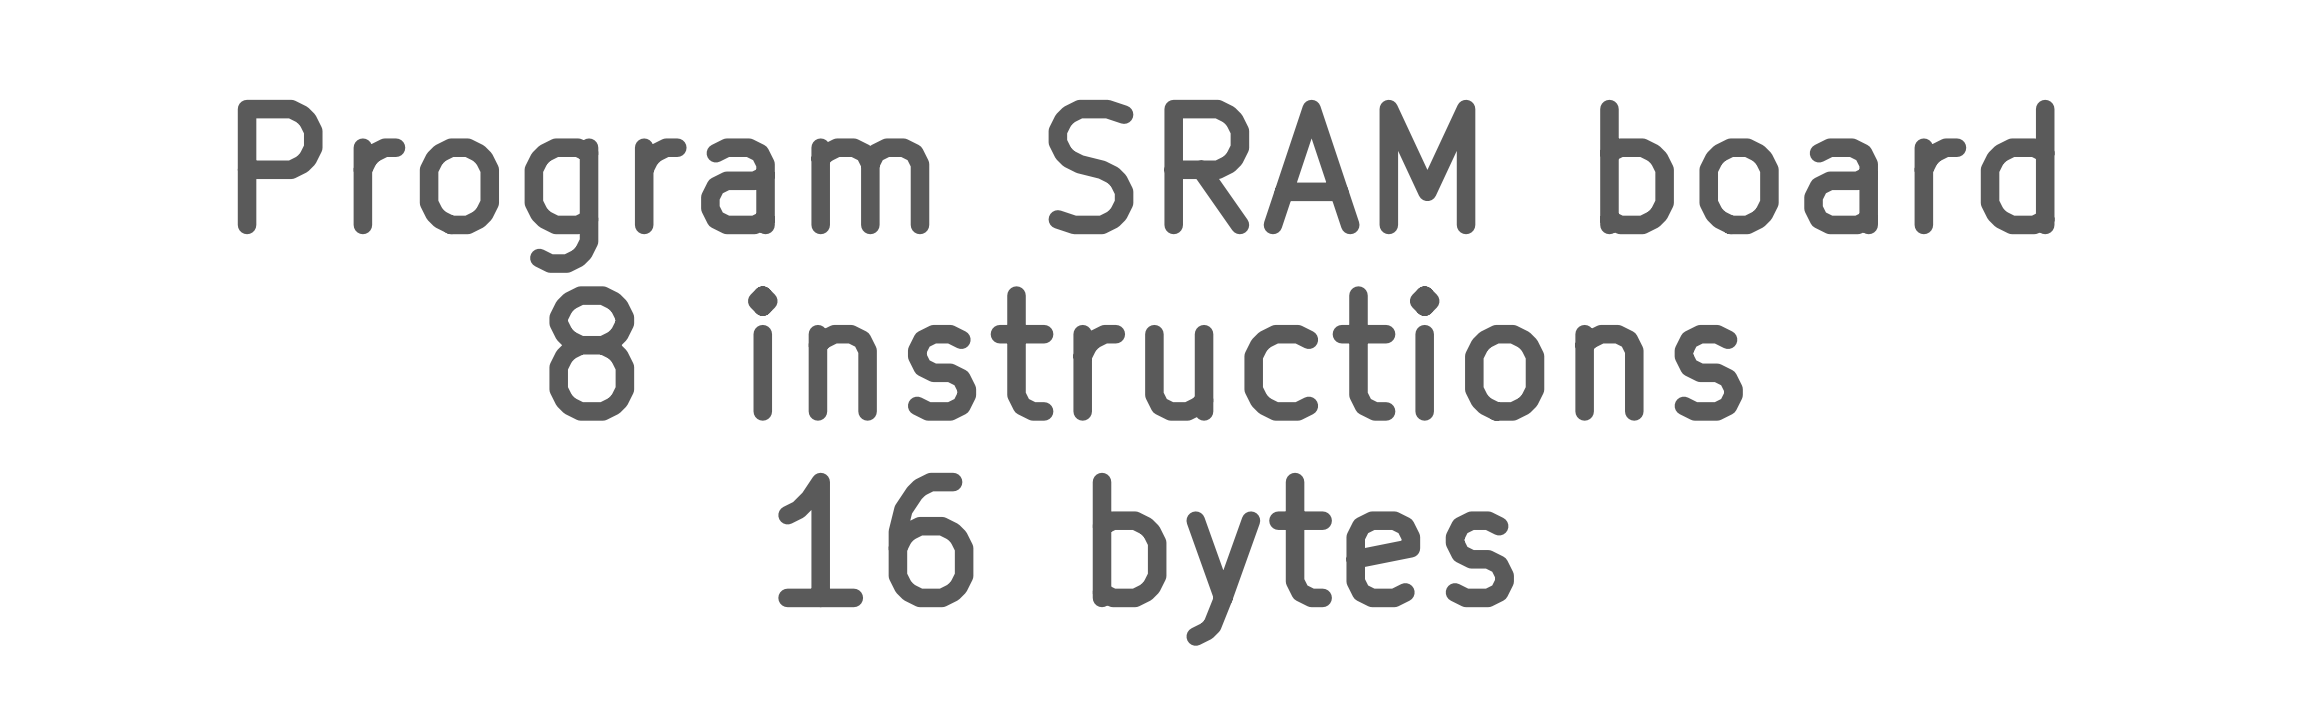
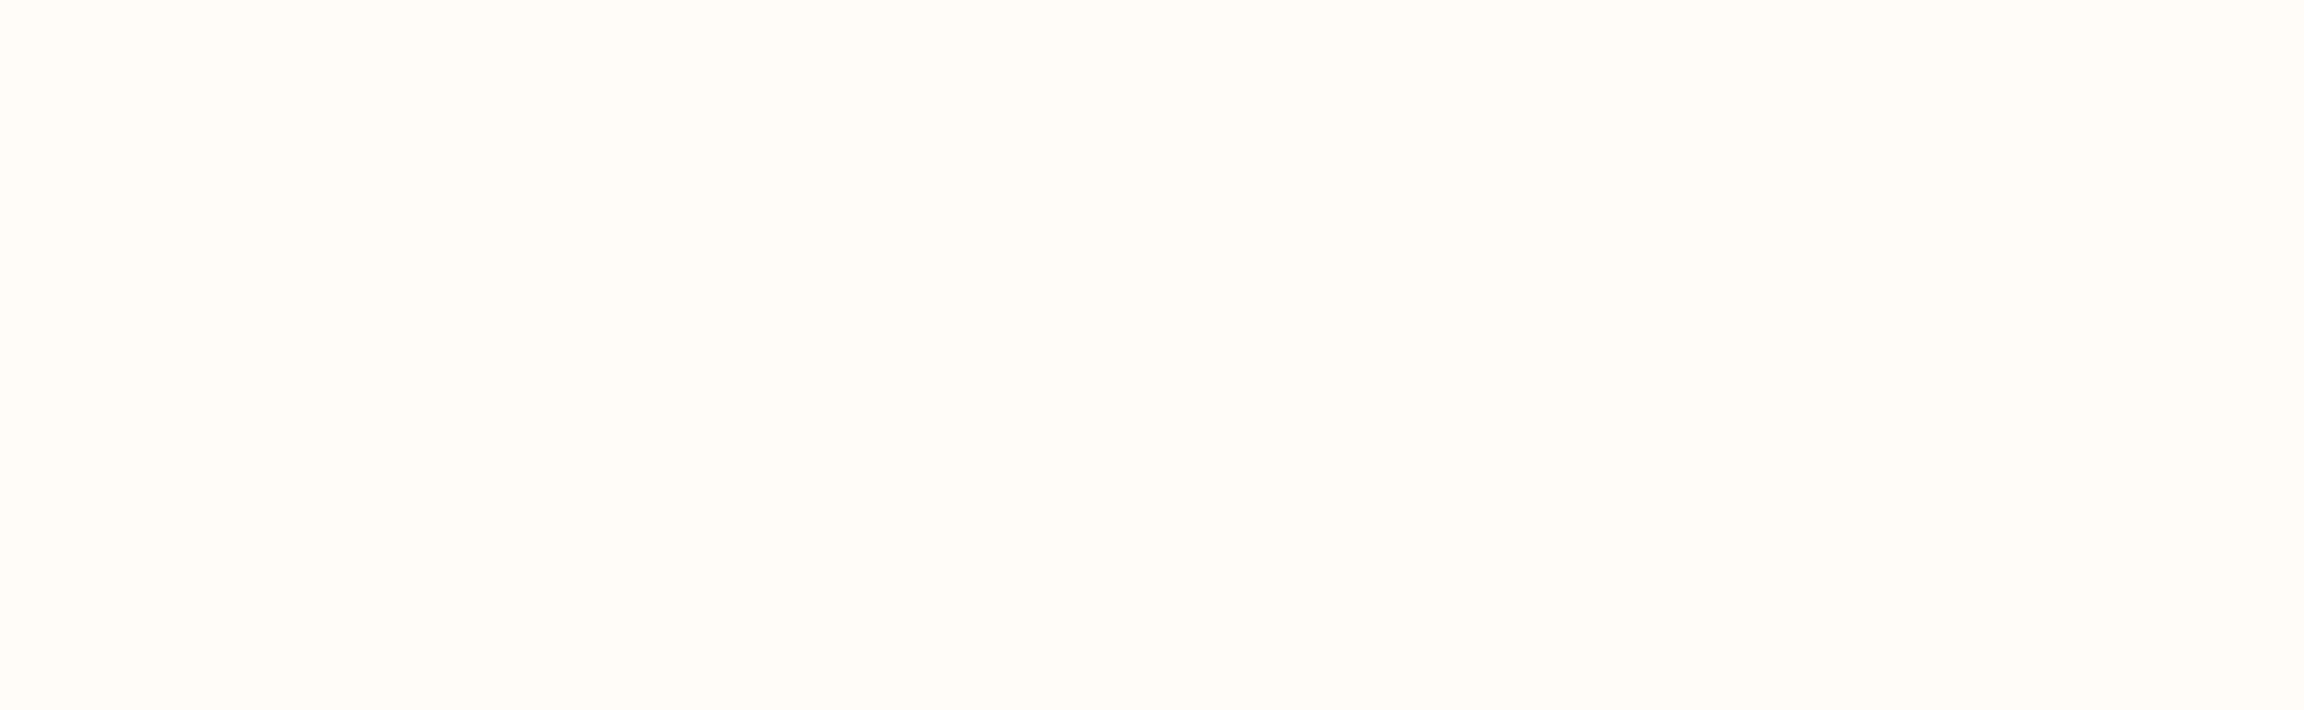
text: Program SRAM board (1146, 186) -> none
text: 8 instructions (1146, 353) -> none
text: 16 bytes (1146, 559) -> none

